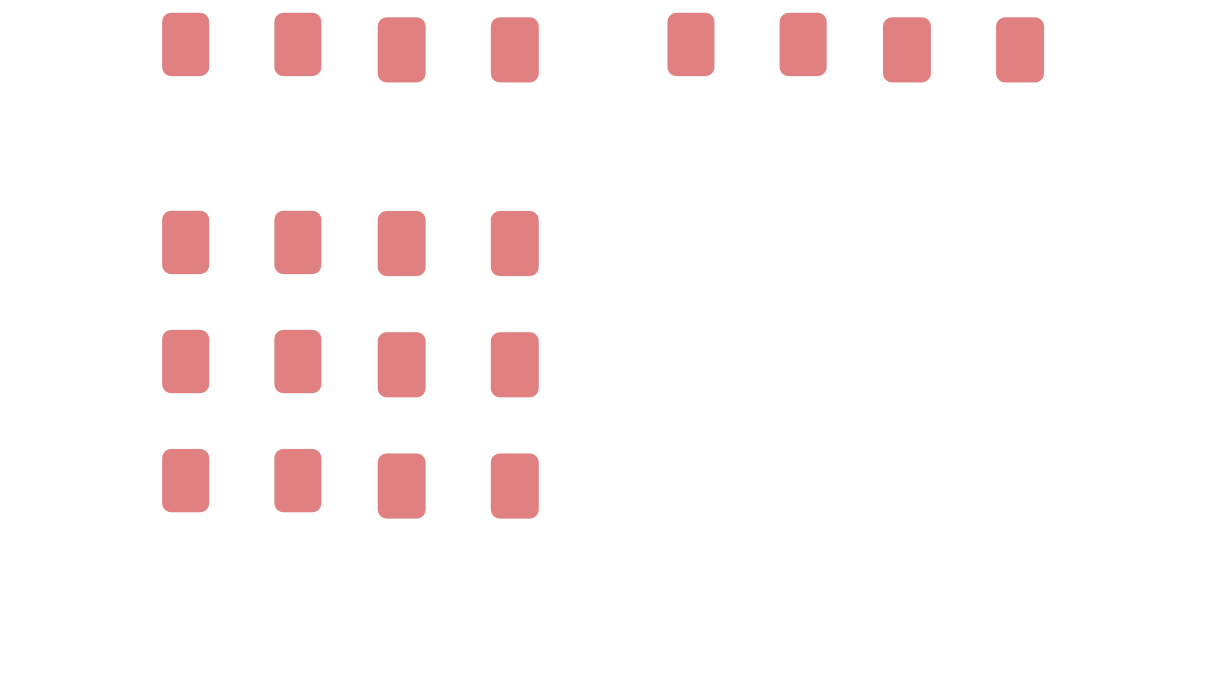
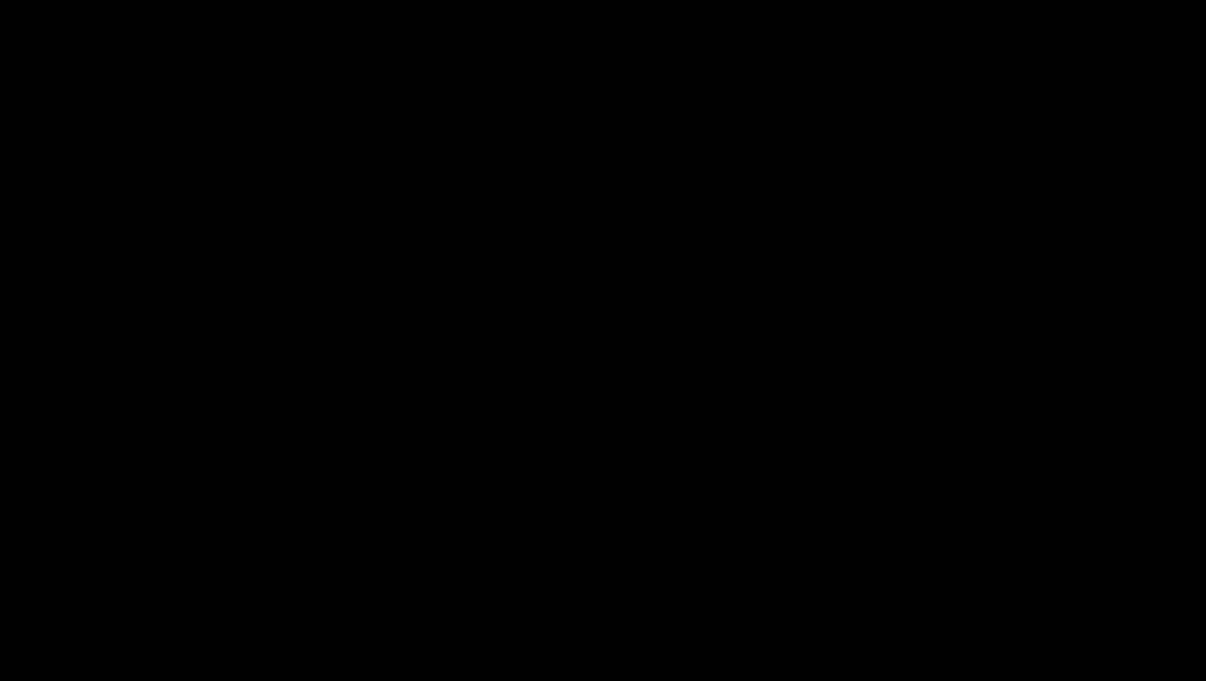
part: (241, 44) -> none
part: (747, 44) -> none
part: (458, 49) -> none
part: (963, 49) -> none
part: (241, 242) -> none
part: (458, 243) -> none
part: (241, 361) -> none
part: (458, 364) -> none
part: (241, 480) -> none
part: (458, 486) -> none

